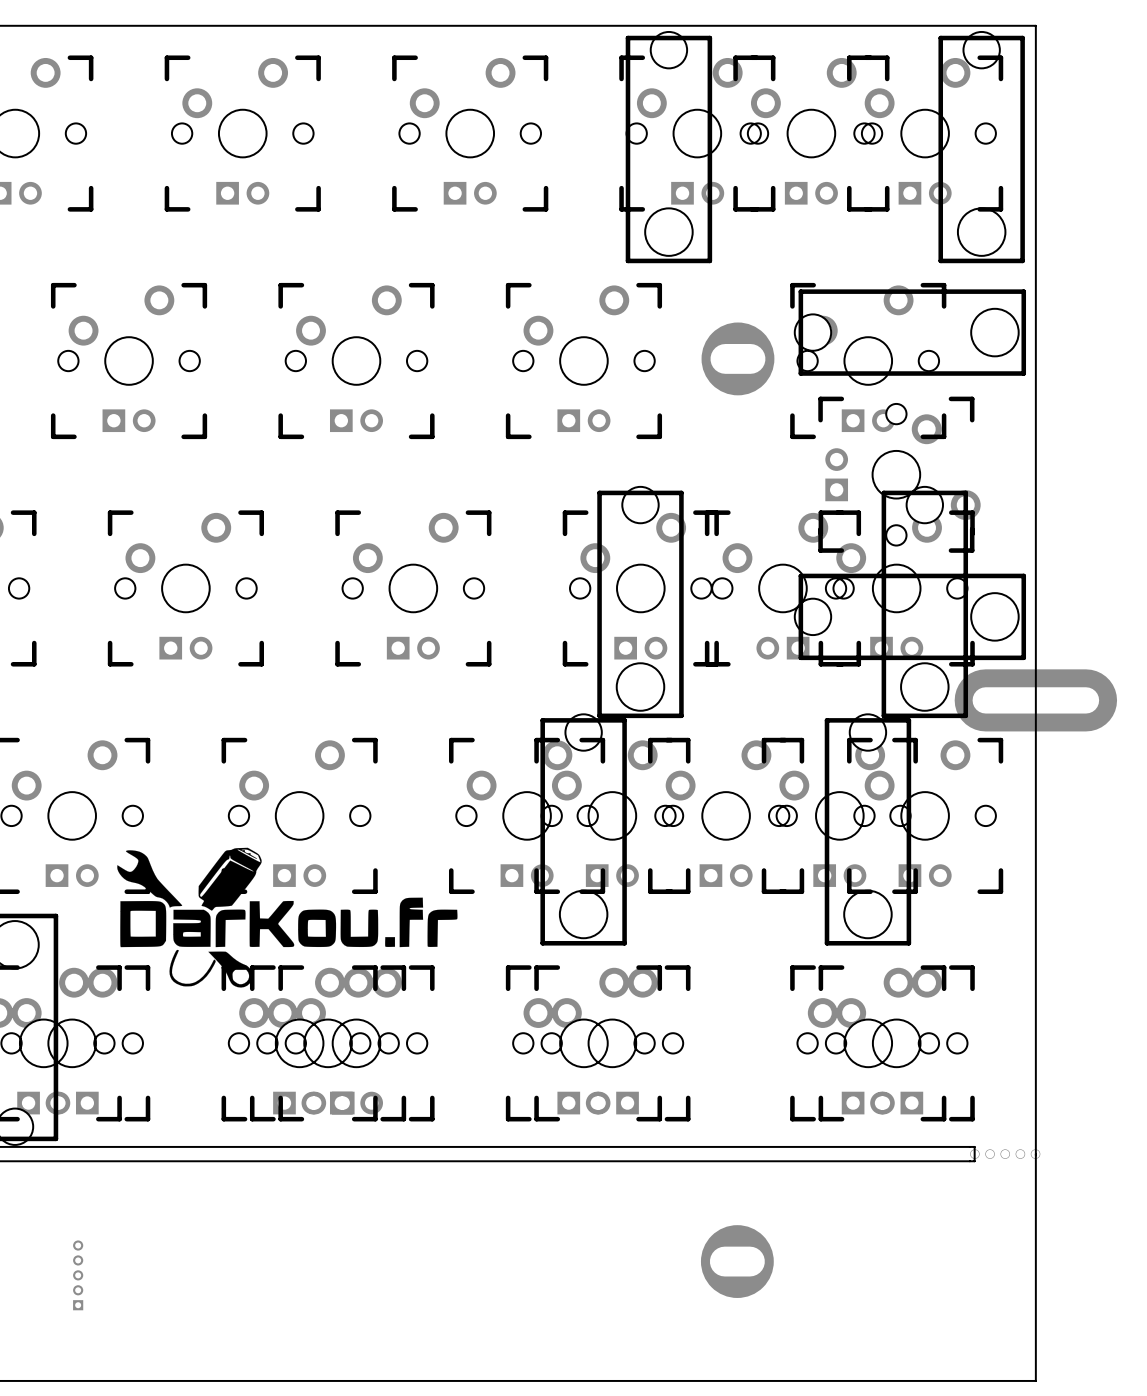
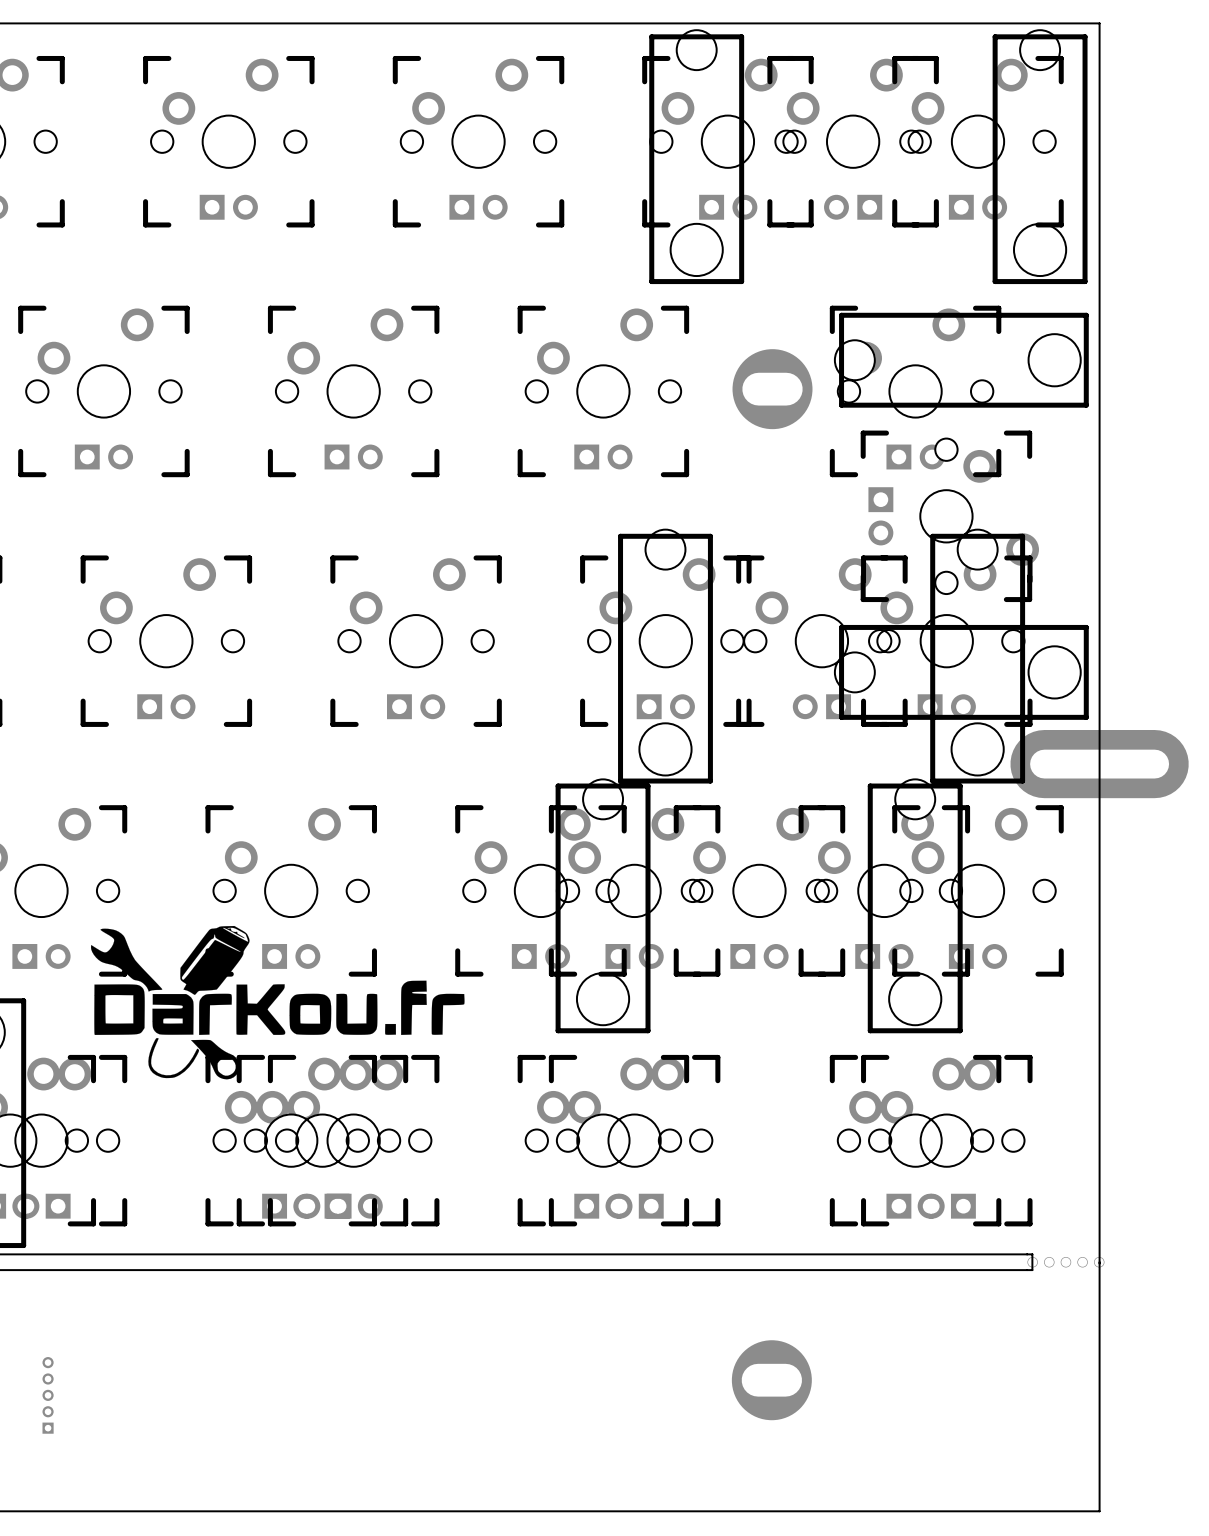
part rotation: 0° (811, 193) -> 180° (853, 207)
part rotation: 0° (836, 474) -> 180° (880, 516)

